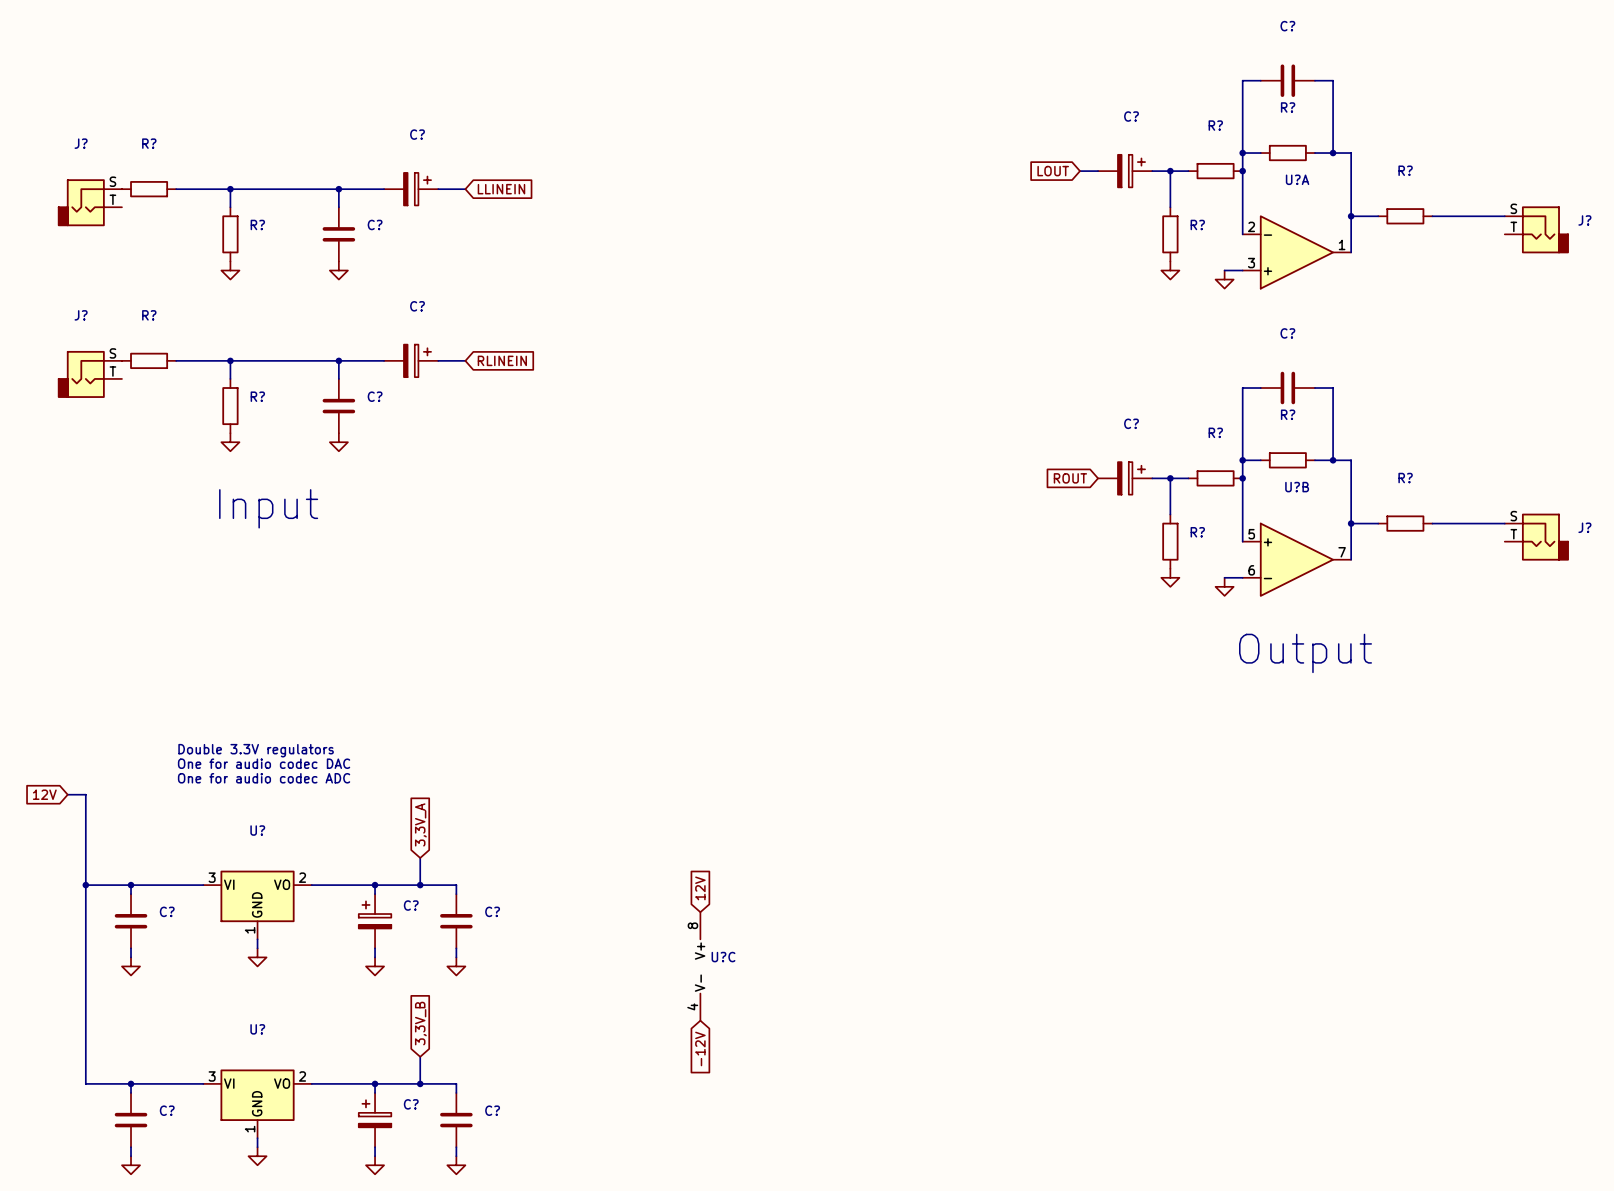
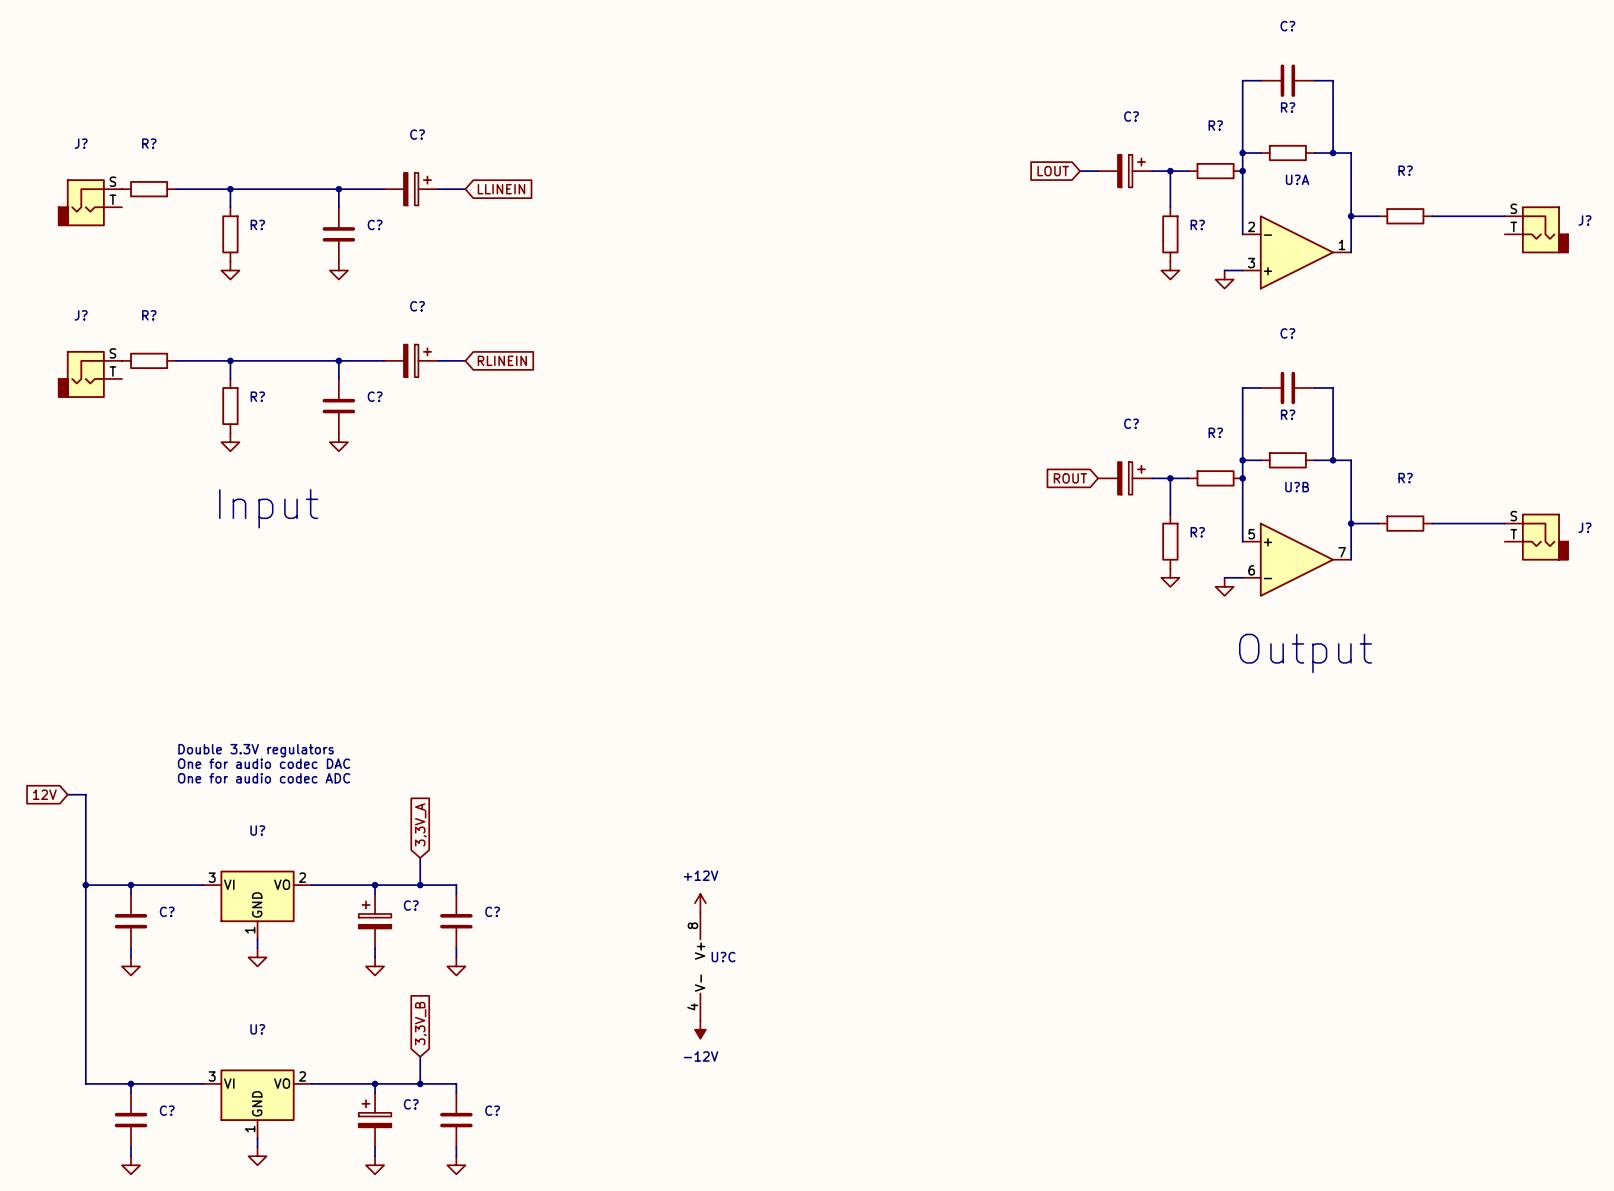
global label: 12V (700, 888) -> none
power symbol: none -> +12V (700, 903)
power symbol: none -> -12V (700, 1029)
global label: -12V (700, 1048) -> none

